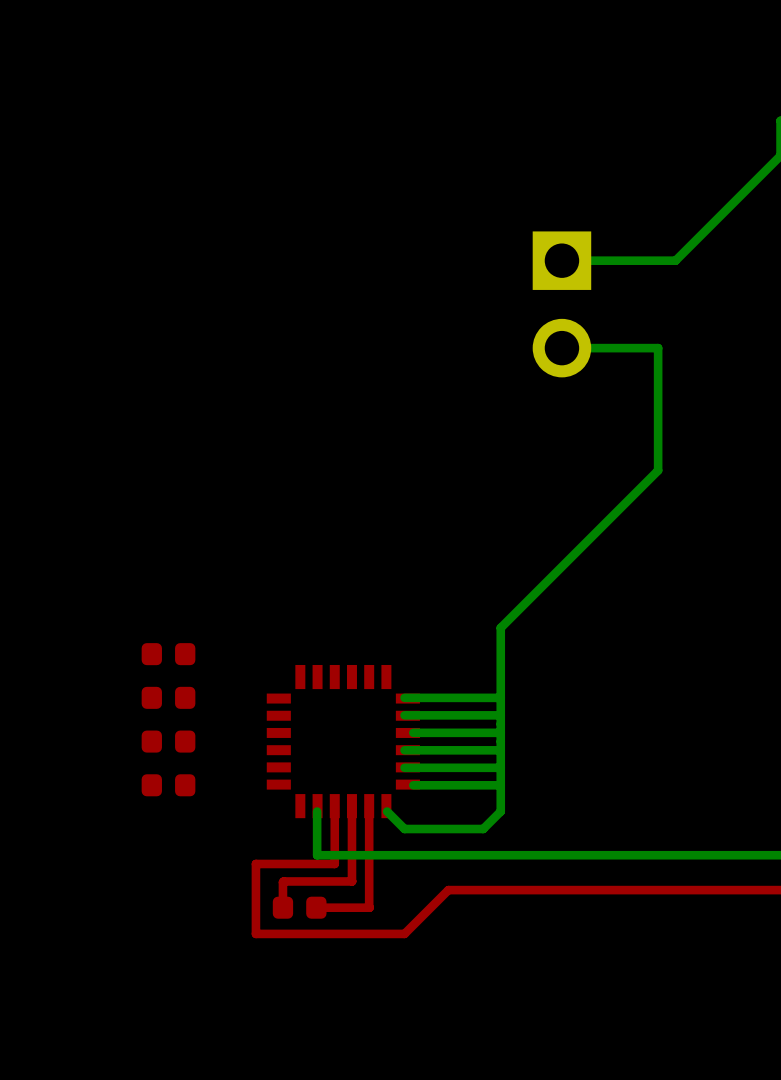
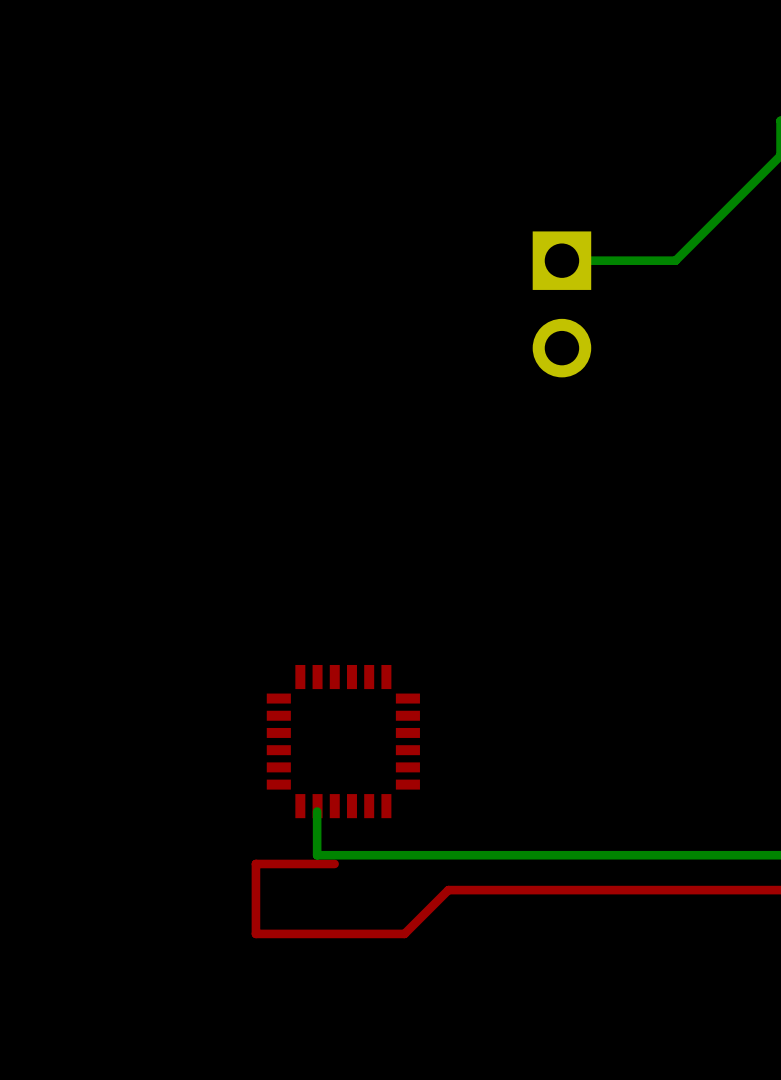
bottom track: (561, 348) (658, 348) (658, 470) (500, 627) (500, 811) (483, 829) (404, 829) (387, 811) -> none
part: (168, 654) -> none
part: (168, 697) -> none
bottom track: (500, 697) (404, 697) -> none
bottom track: (500, 715) (404, 715) -> none
bottom track: (500, 732) (413, 732) -> none
part: (168, 741) -> none
bottom track: (500, 750) (404, 750) -> none
bottom track: (500, 767) (404, 767) -> none
part: (168, 785) -> none
bottom track: (500, 785) (413, 785) -> none
top track: (334, 806) (334, 863) -> none
top track: (351, 806) (351, 881) (283, 881) (282, 907) -> none
top track: (369, 806) (369, 907) -> none
part: (299, 907) -> none
top track: (369, 907) (316, 907) -> none

